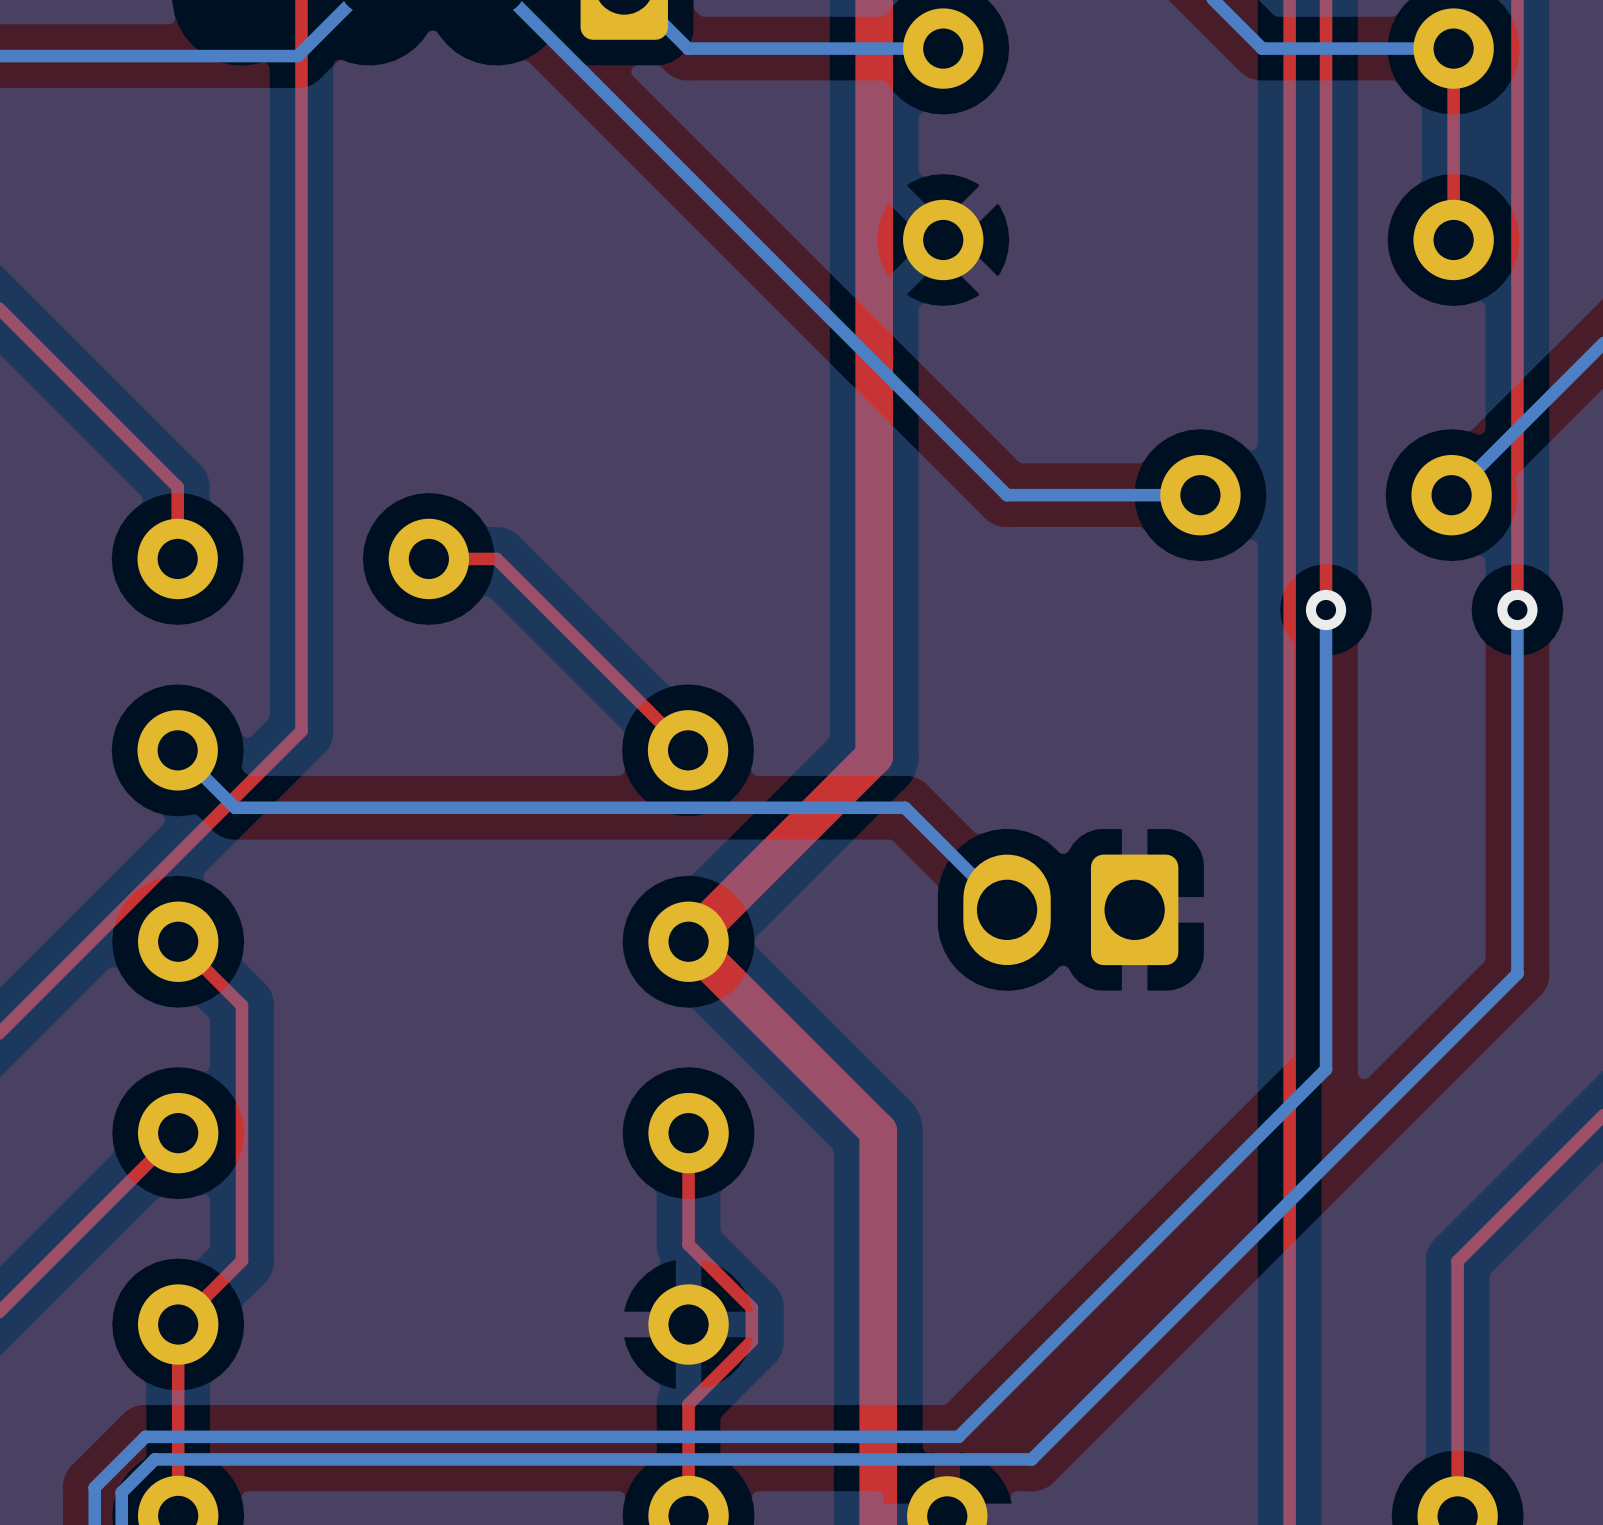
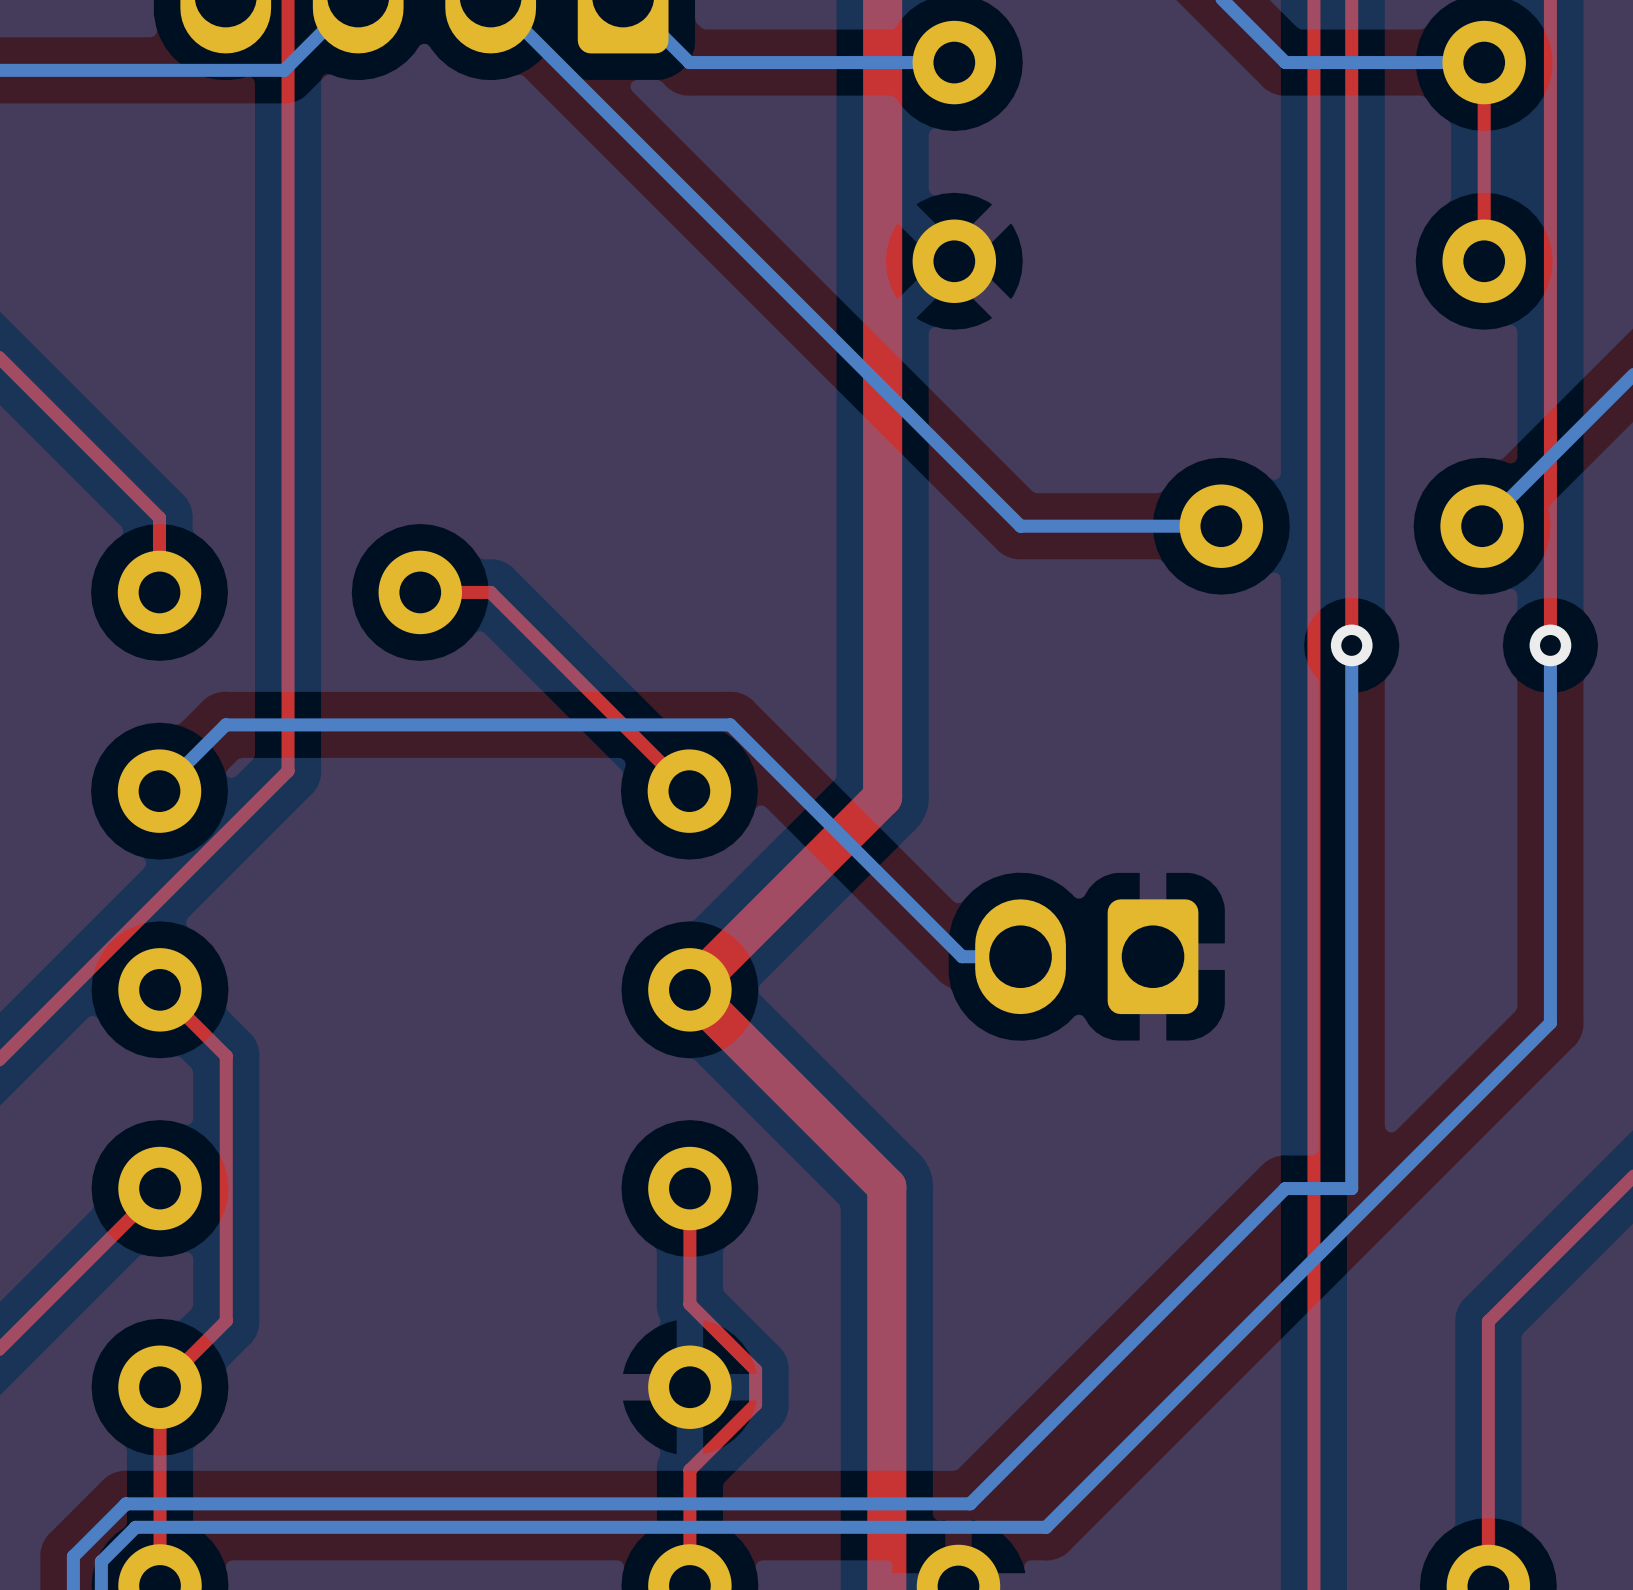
bottom track: (177, 750) (235, 807) (904, 807) (1007, 909) -> (159, 791) (225, 724) (730, 724) (962, 956) (1020, 956)
bottom track: (1326, 1069) (1262, 1133) -> (1351, 1122) (1351, 1188) (1285, 1188)

